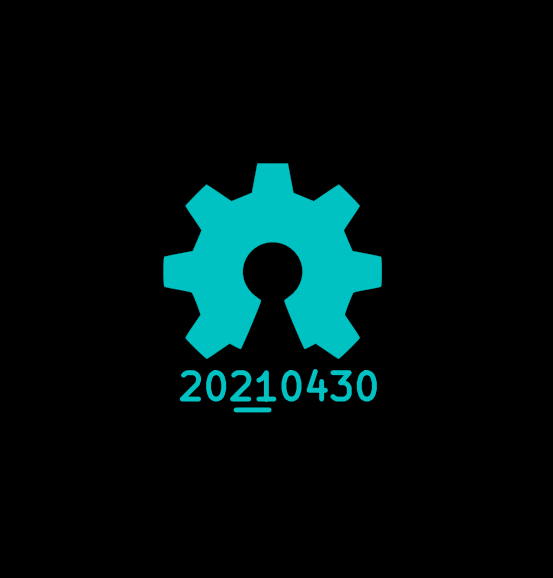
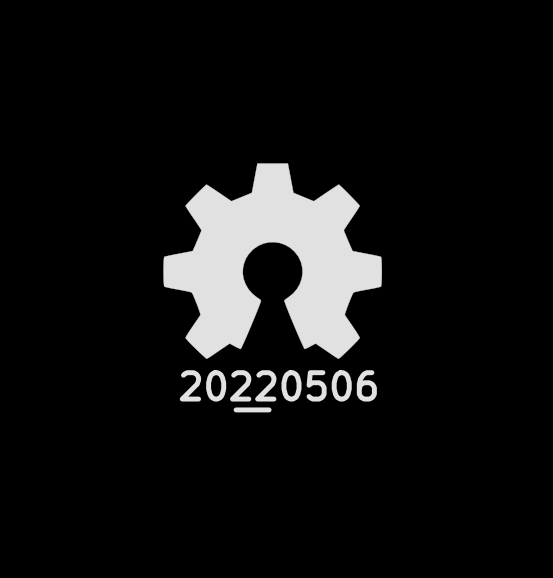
drawing shape: [179, 368, 377, 413] -> [179, 370, 377, 413]

